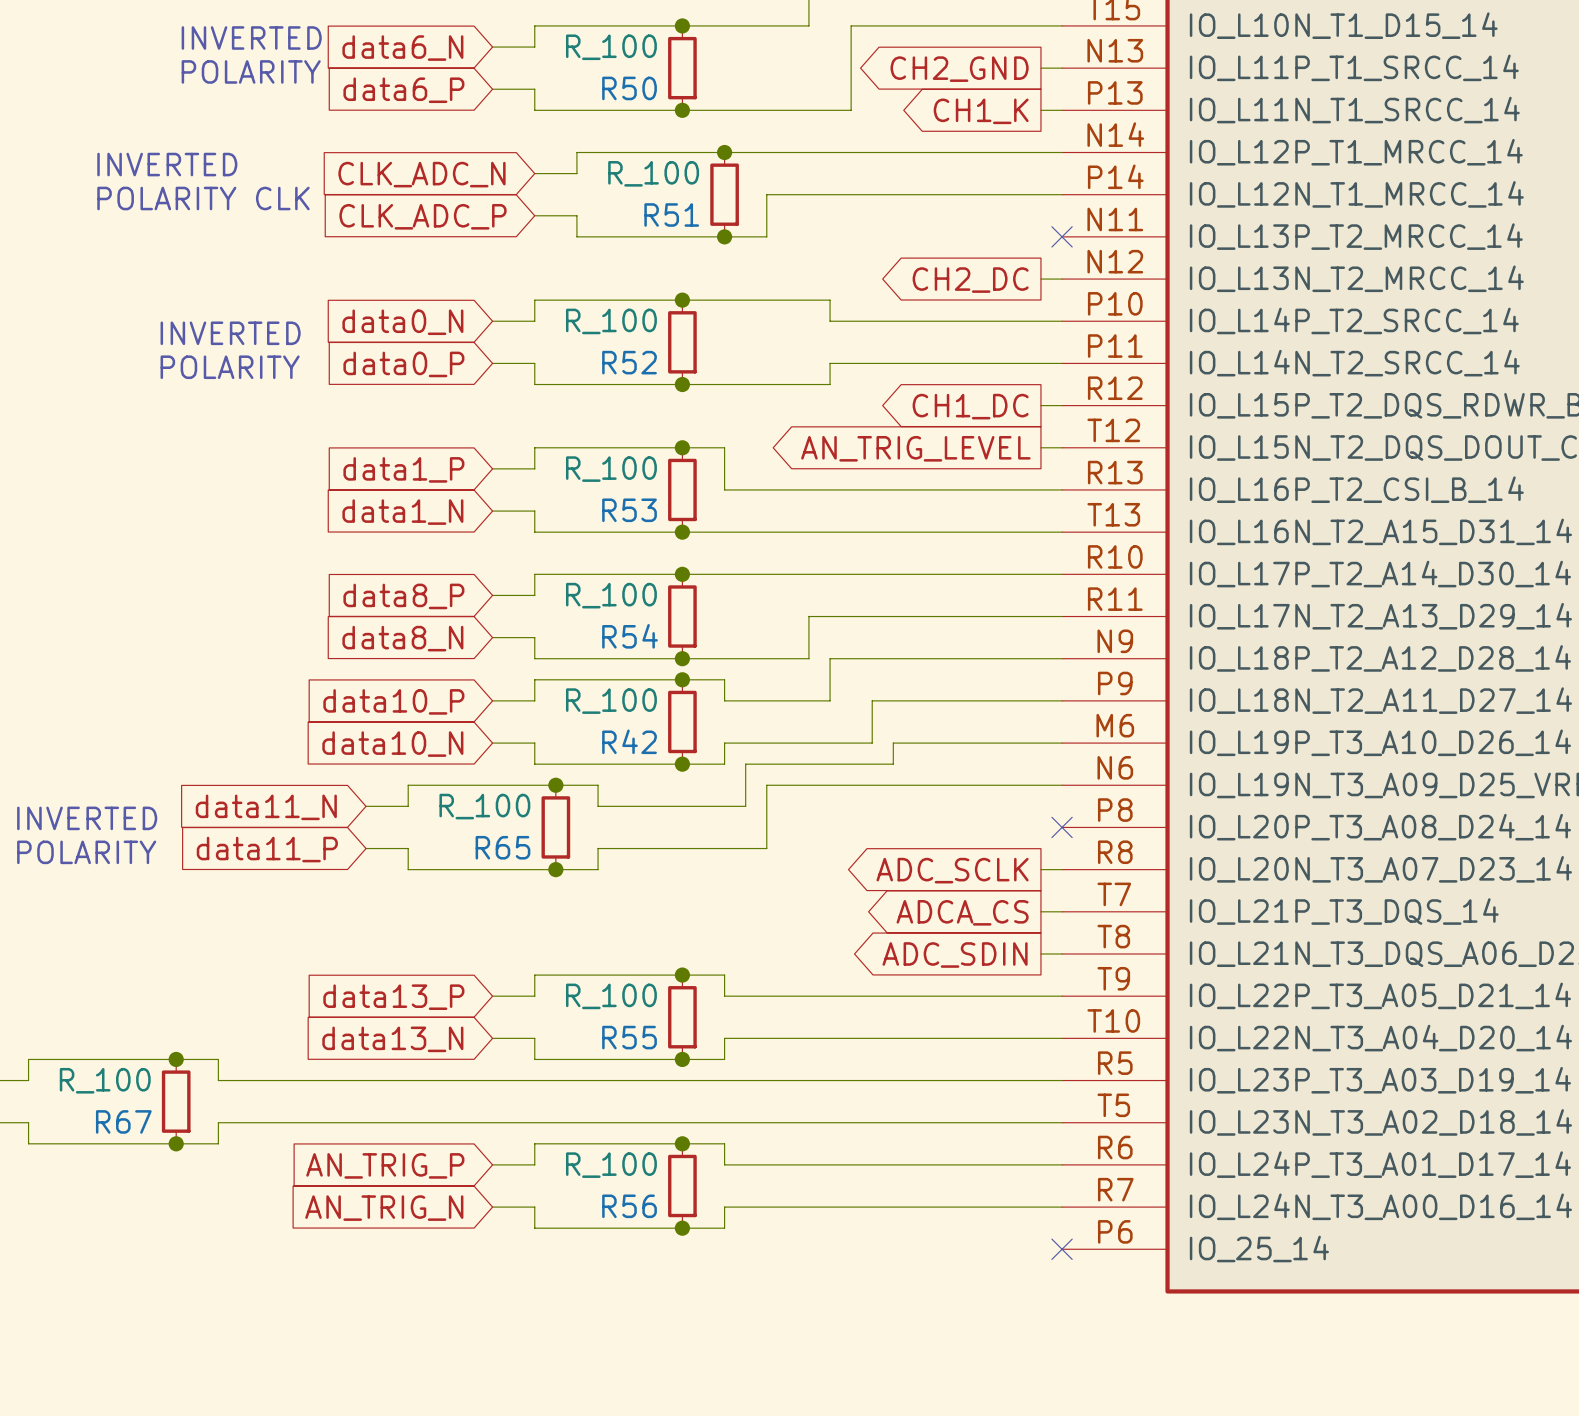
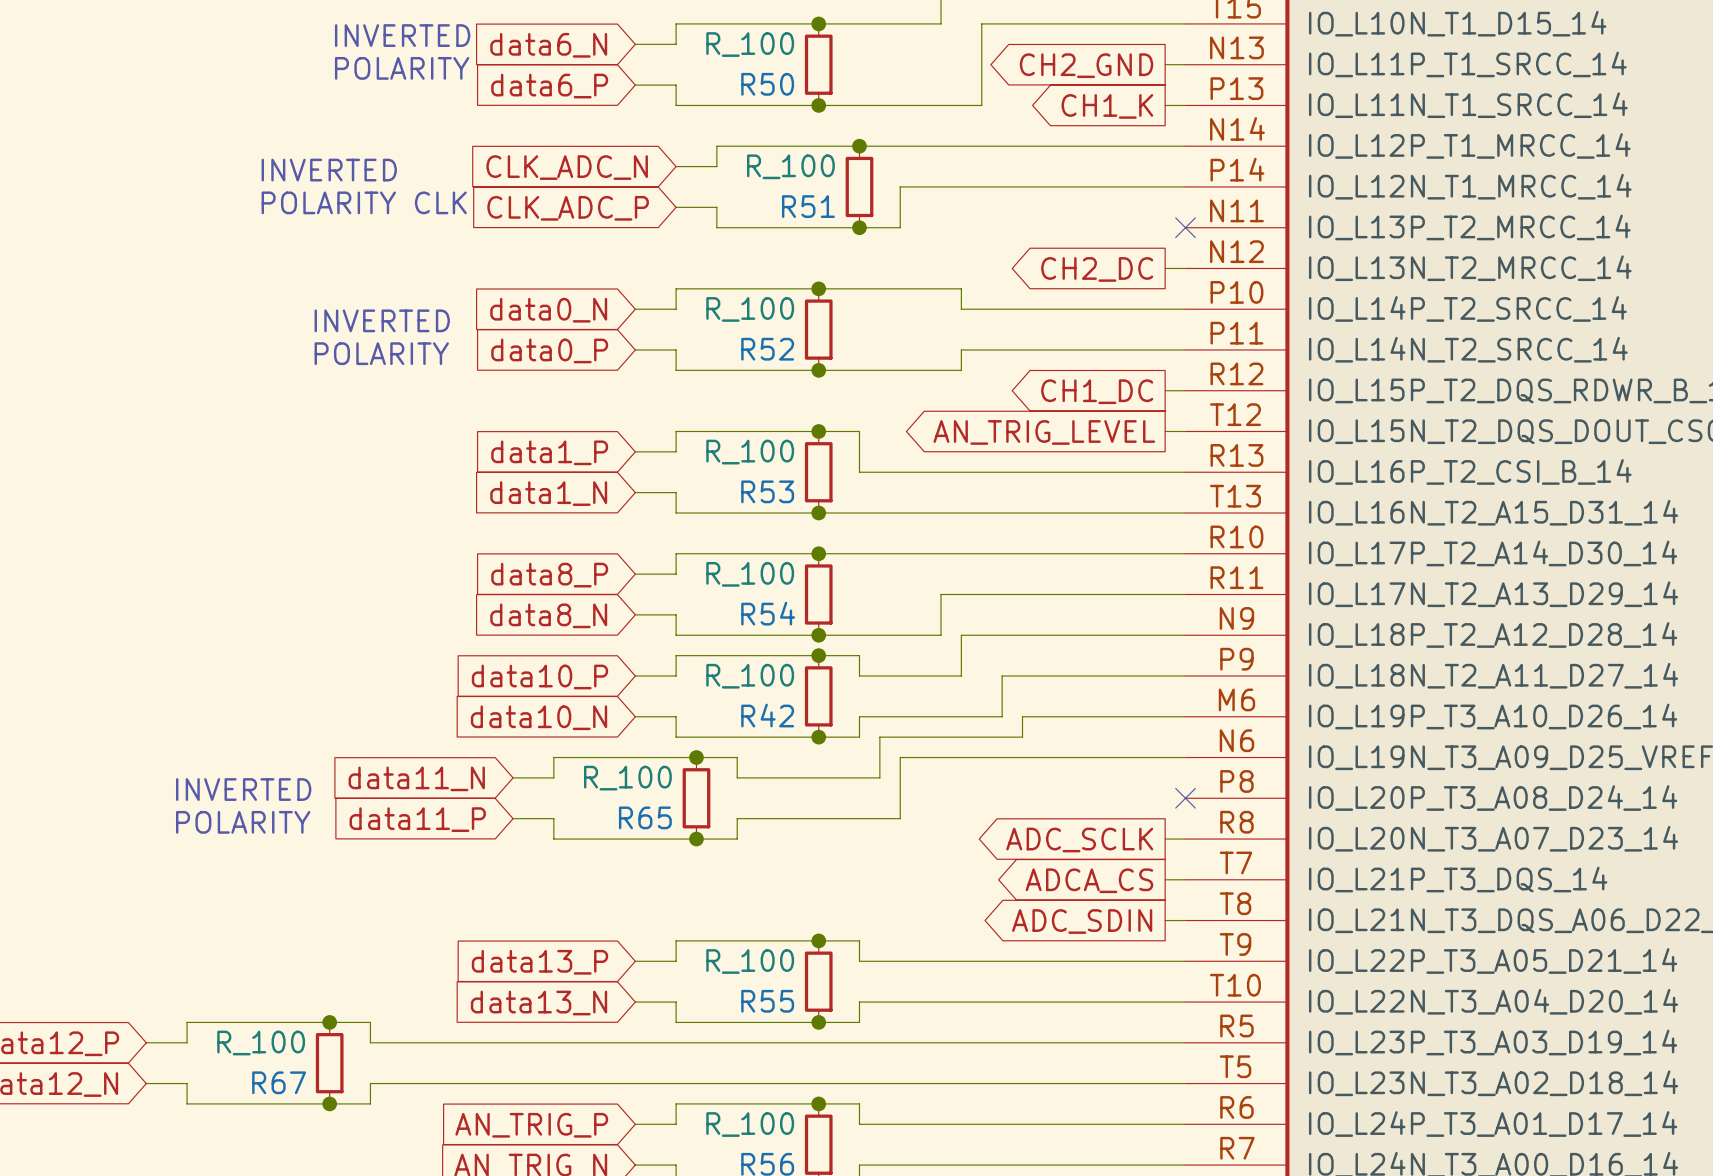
text position: INVERTED (167, 164) -> INVERTED (329, 170)
text position: POLARITY CLK (203, 198) -> POLARITY CLK (364, 202)

